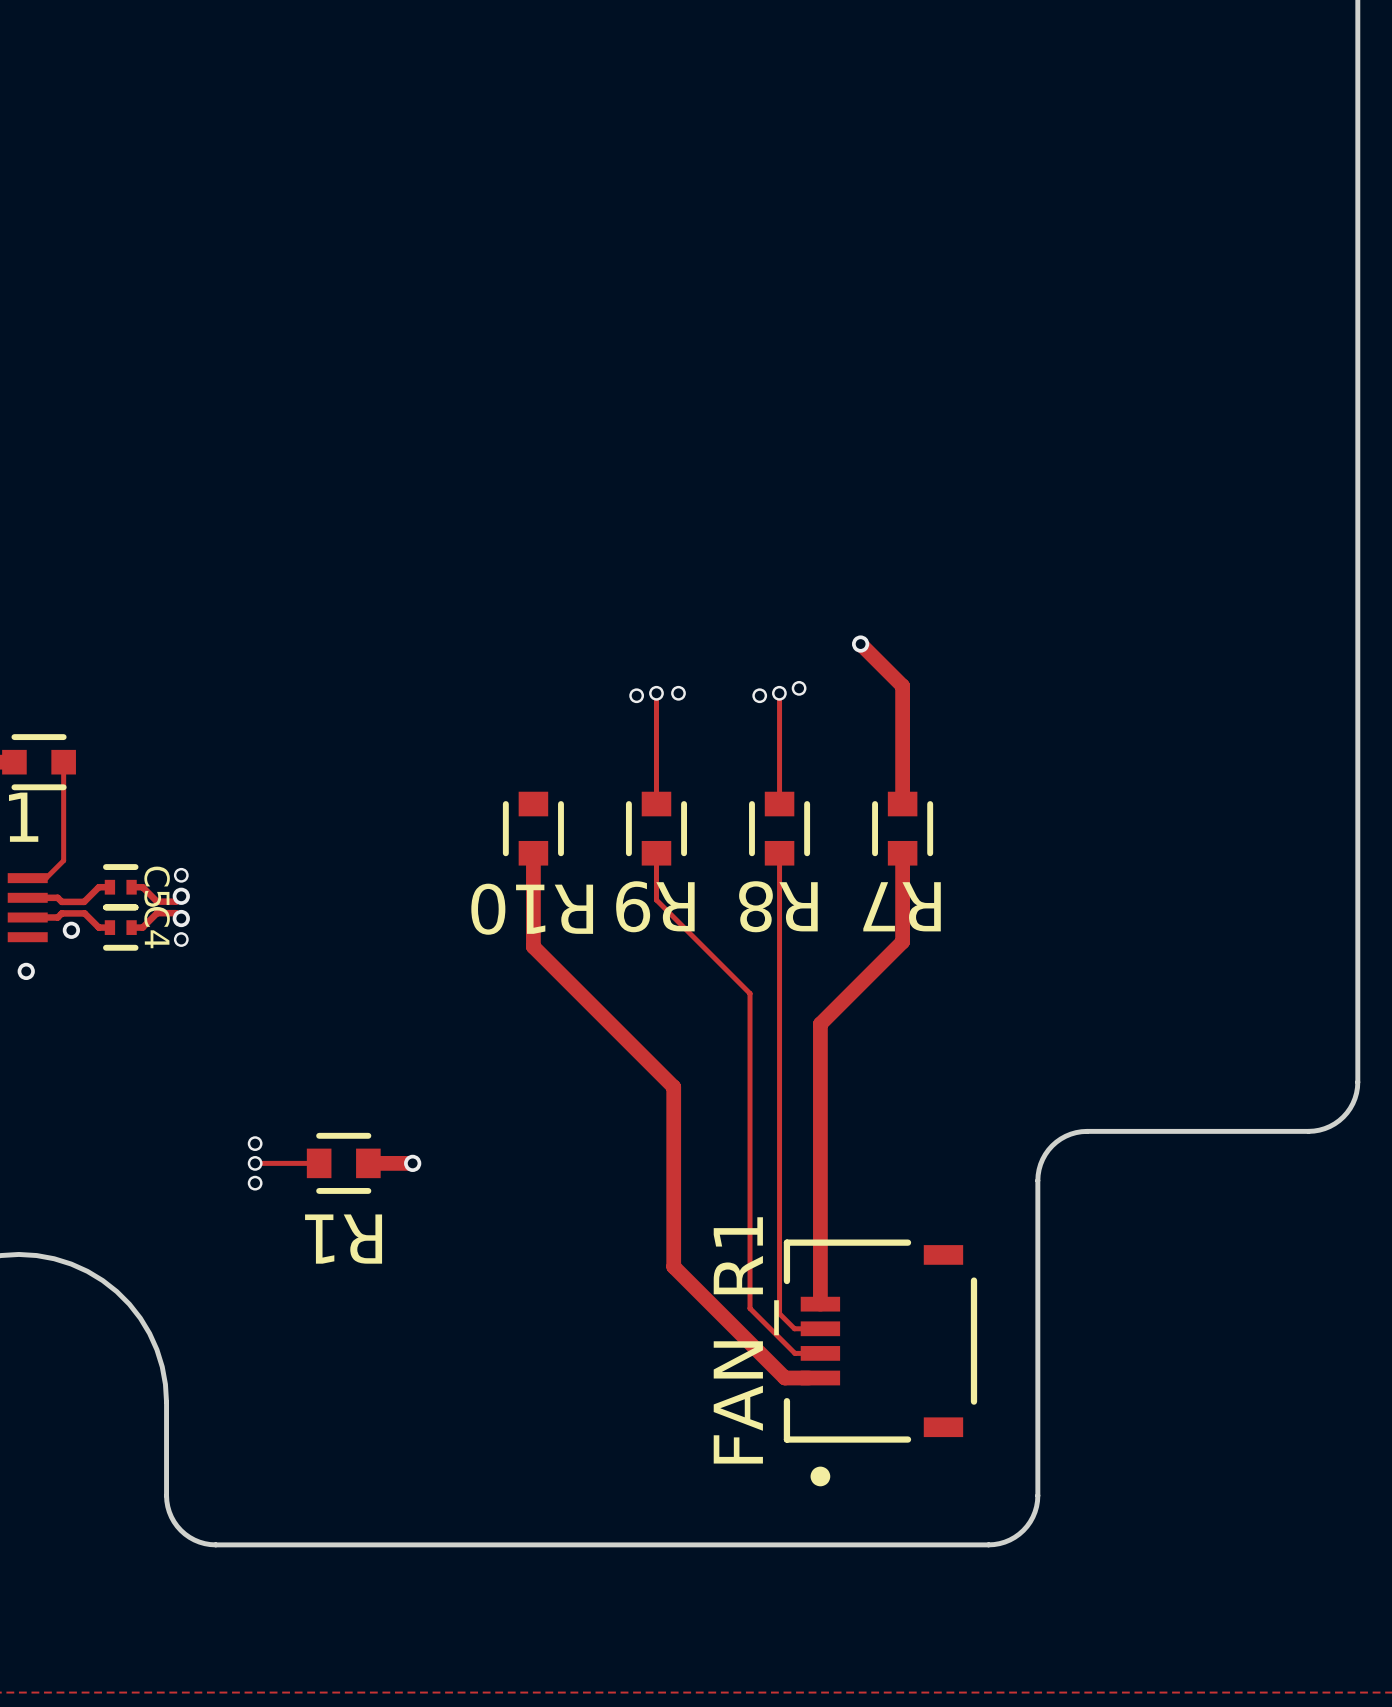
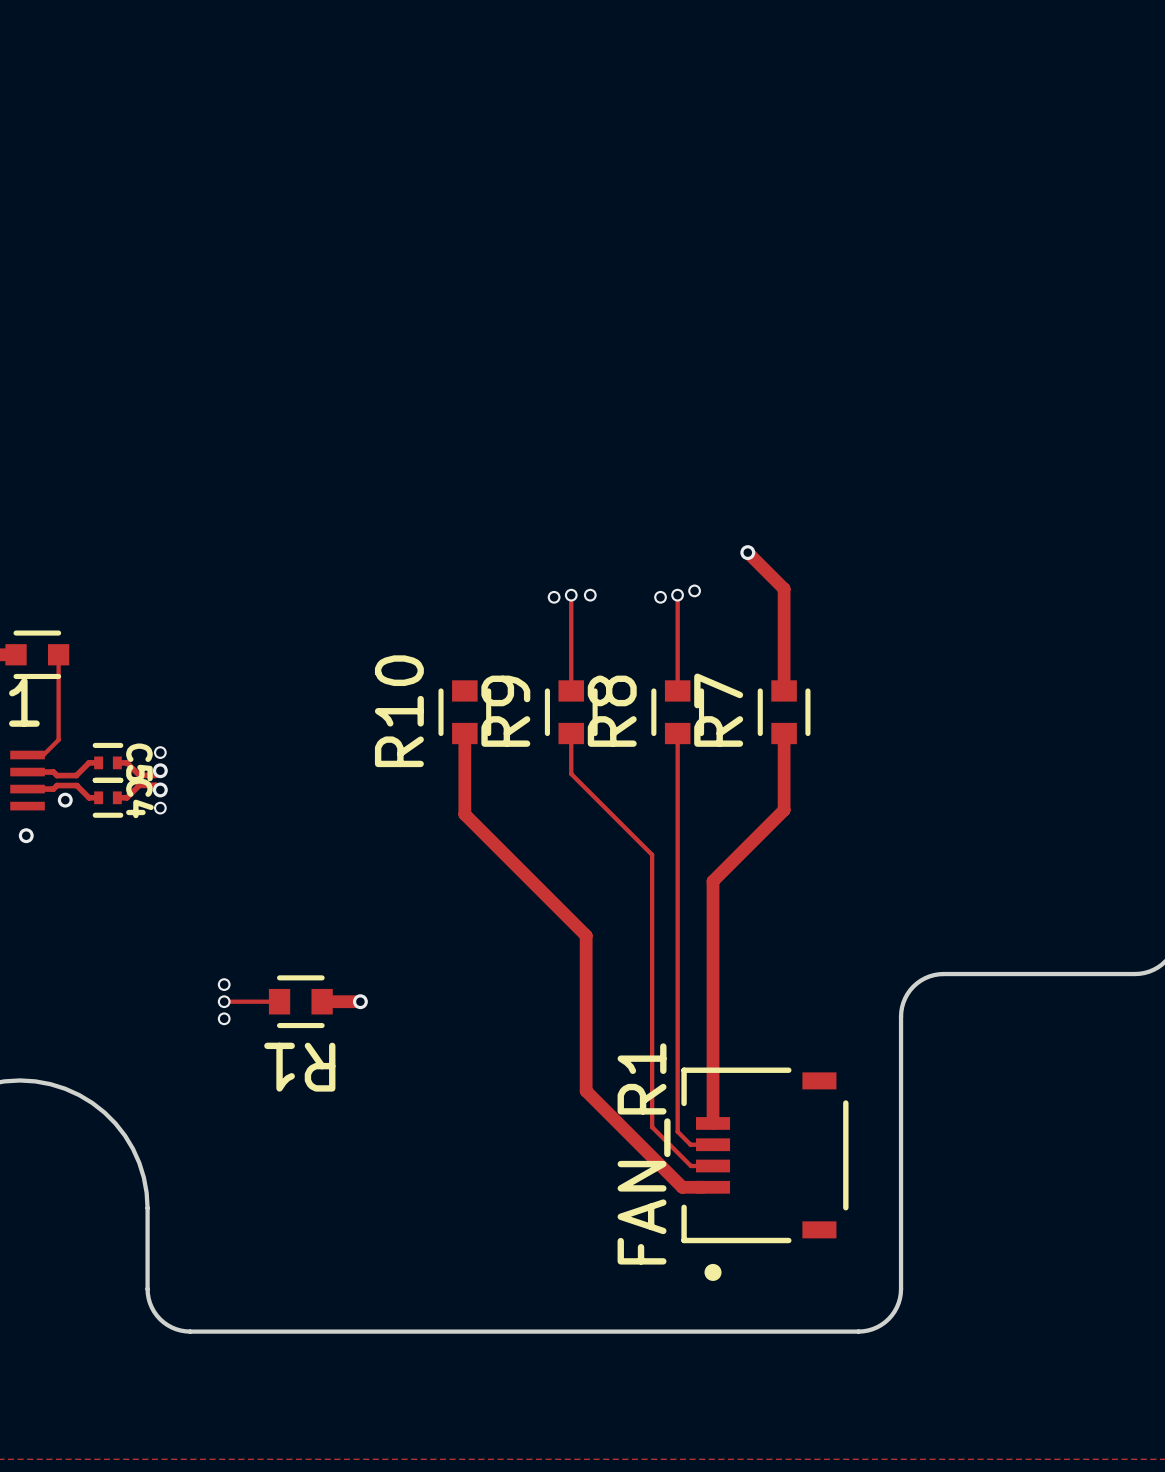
R9 name rotation: 0° (655, 906) -> 90° clockwise (505, 711)
R8 name rotation: 0° (778, 906) -> 90° clockwise (612, 711)
R7 name rotation: 0° (902, 906) -> 90° clockwise (718, 710)
R10 name rotation: 0° (532, 909) -> 90° clockwise (399, 711)

